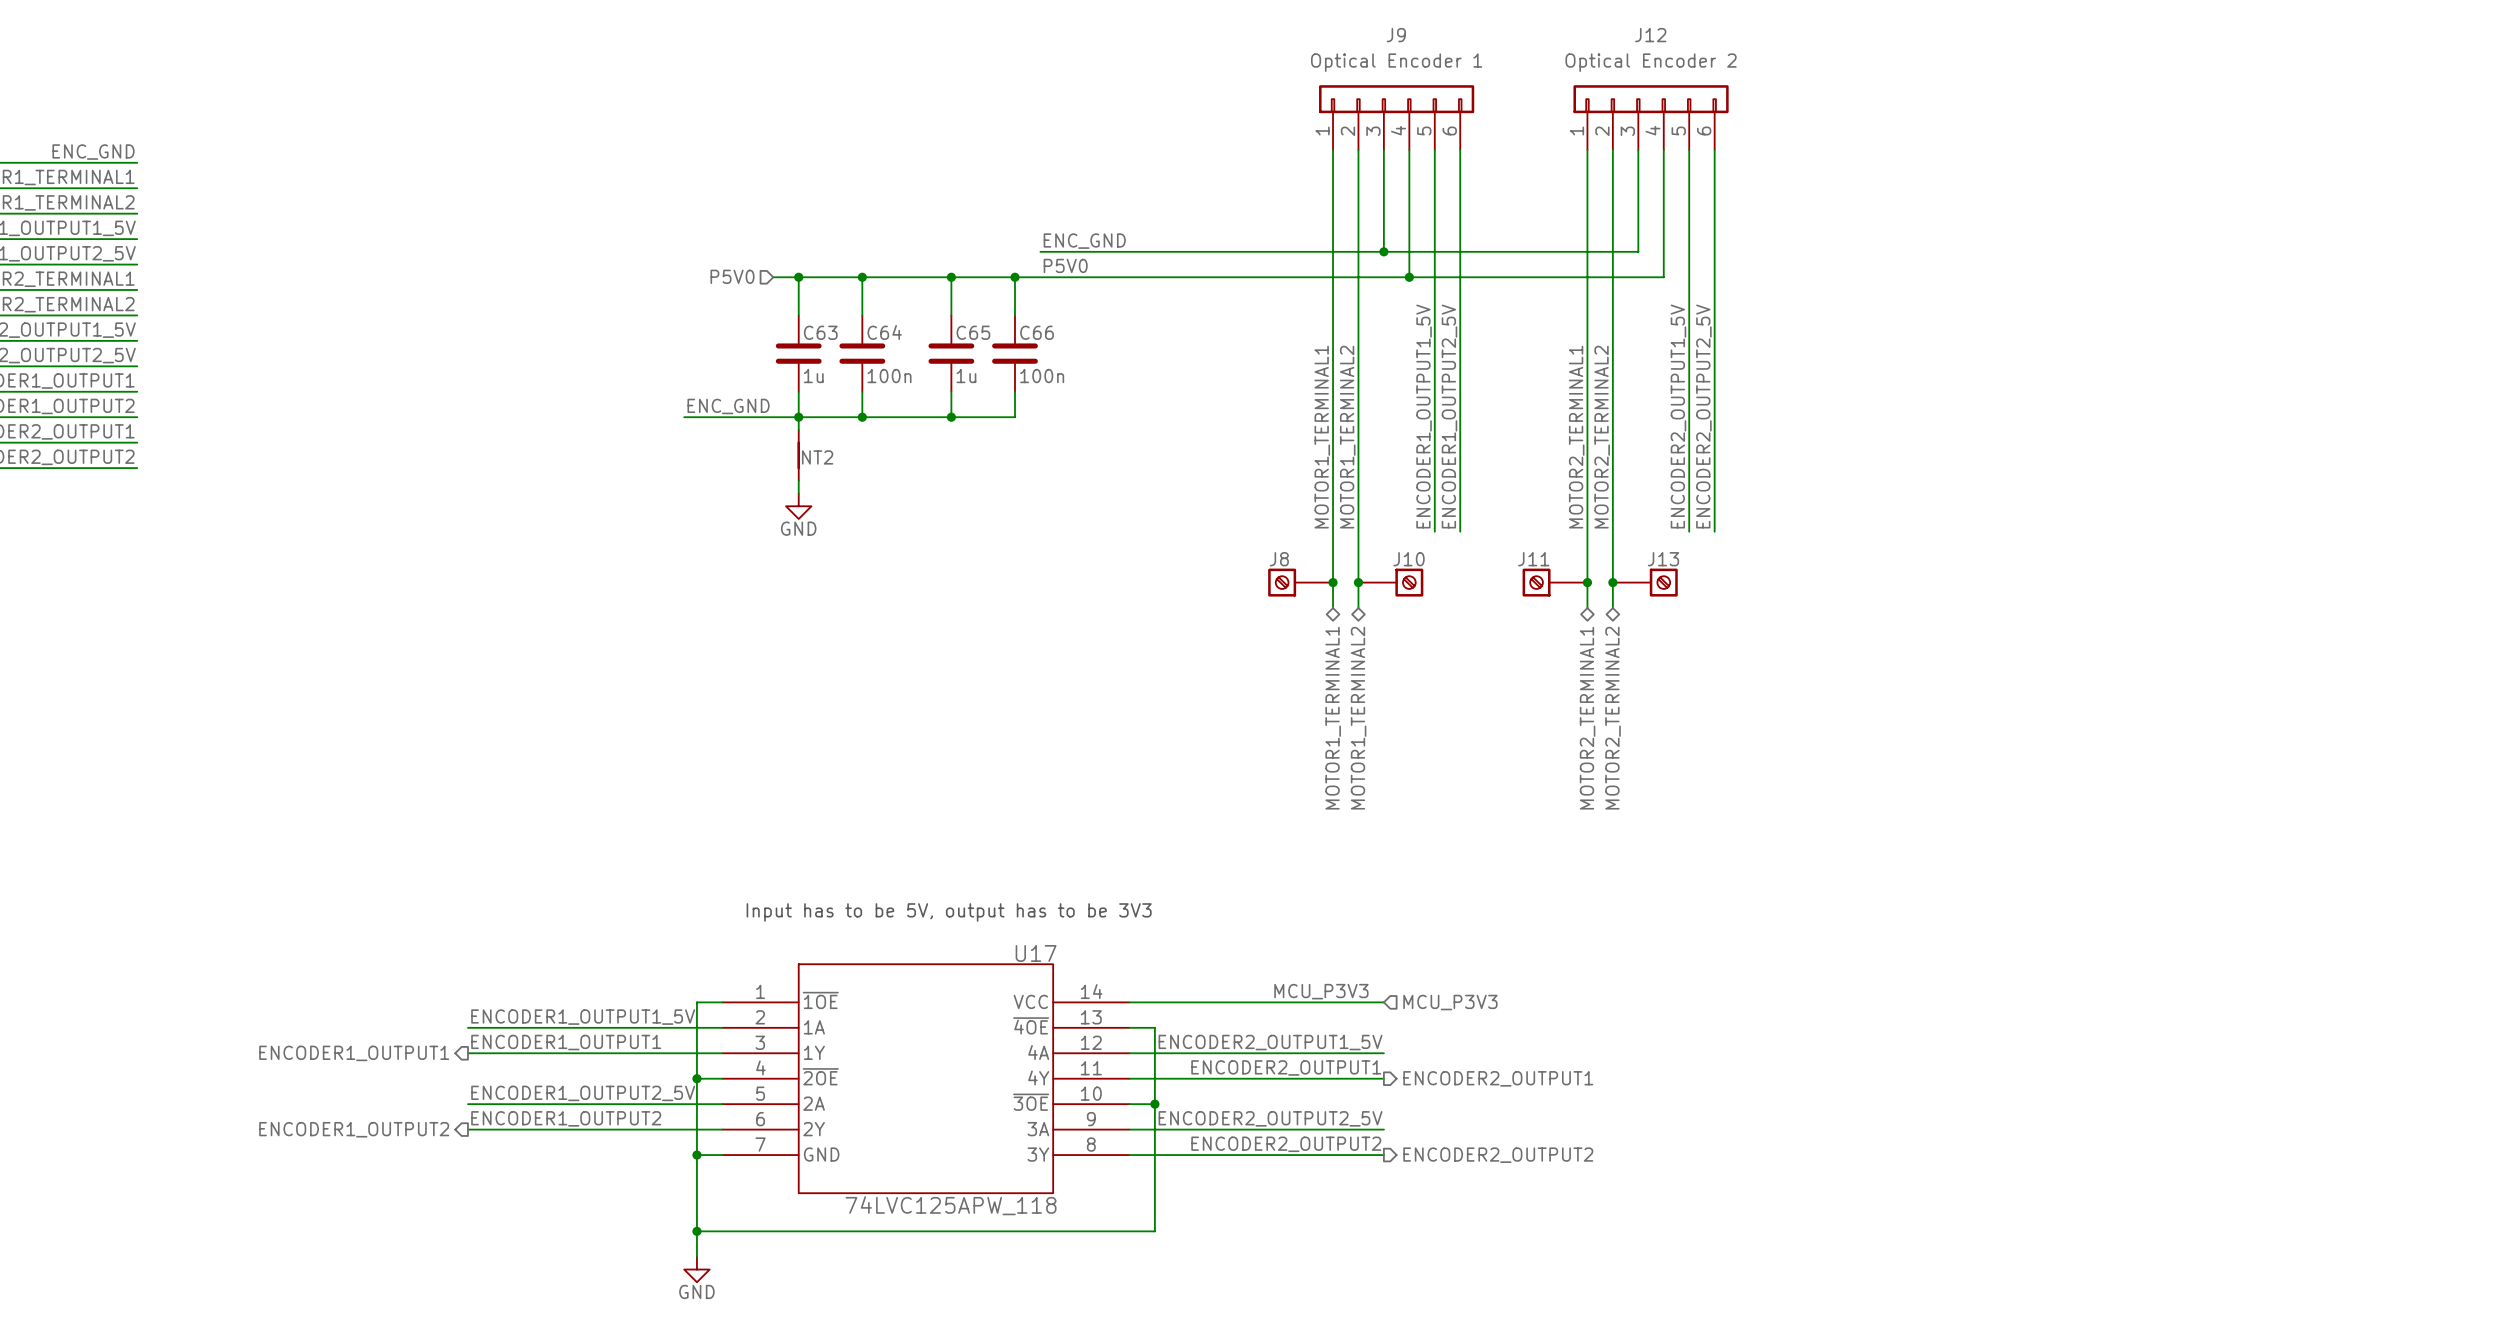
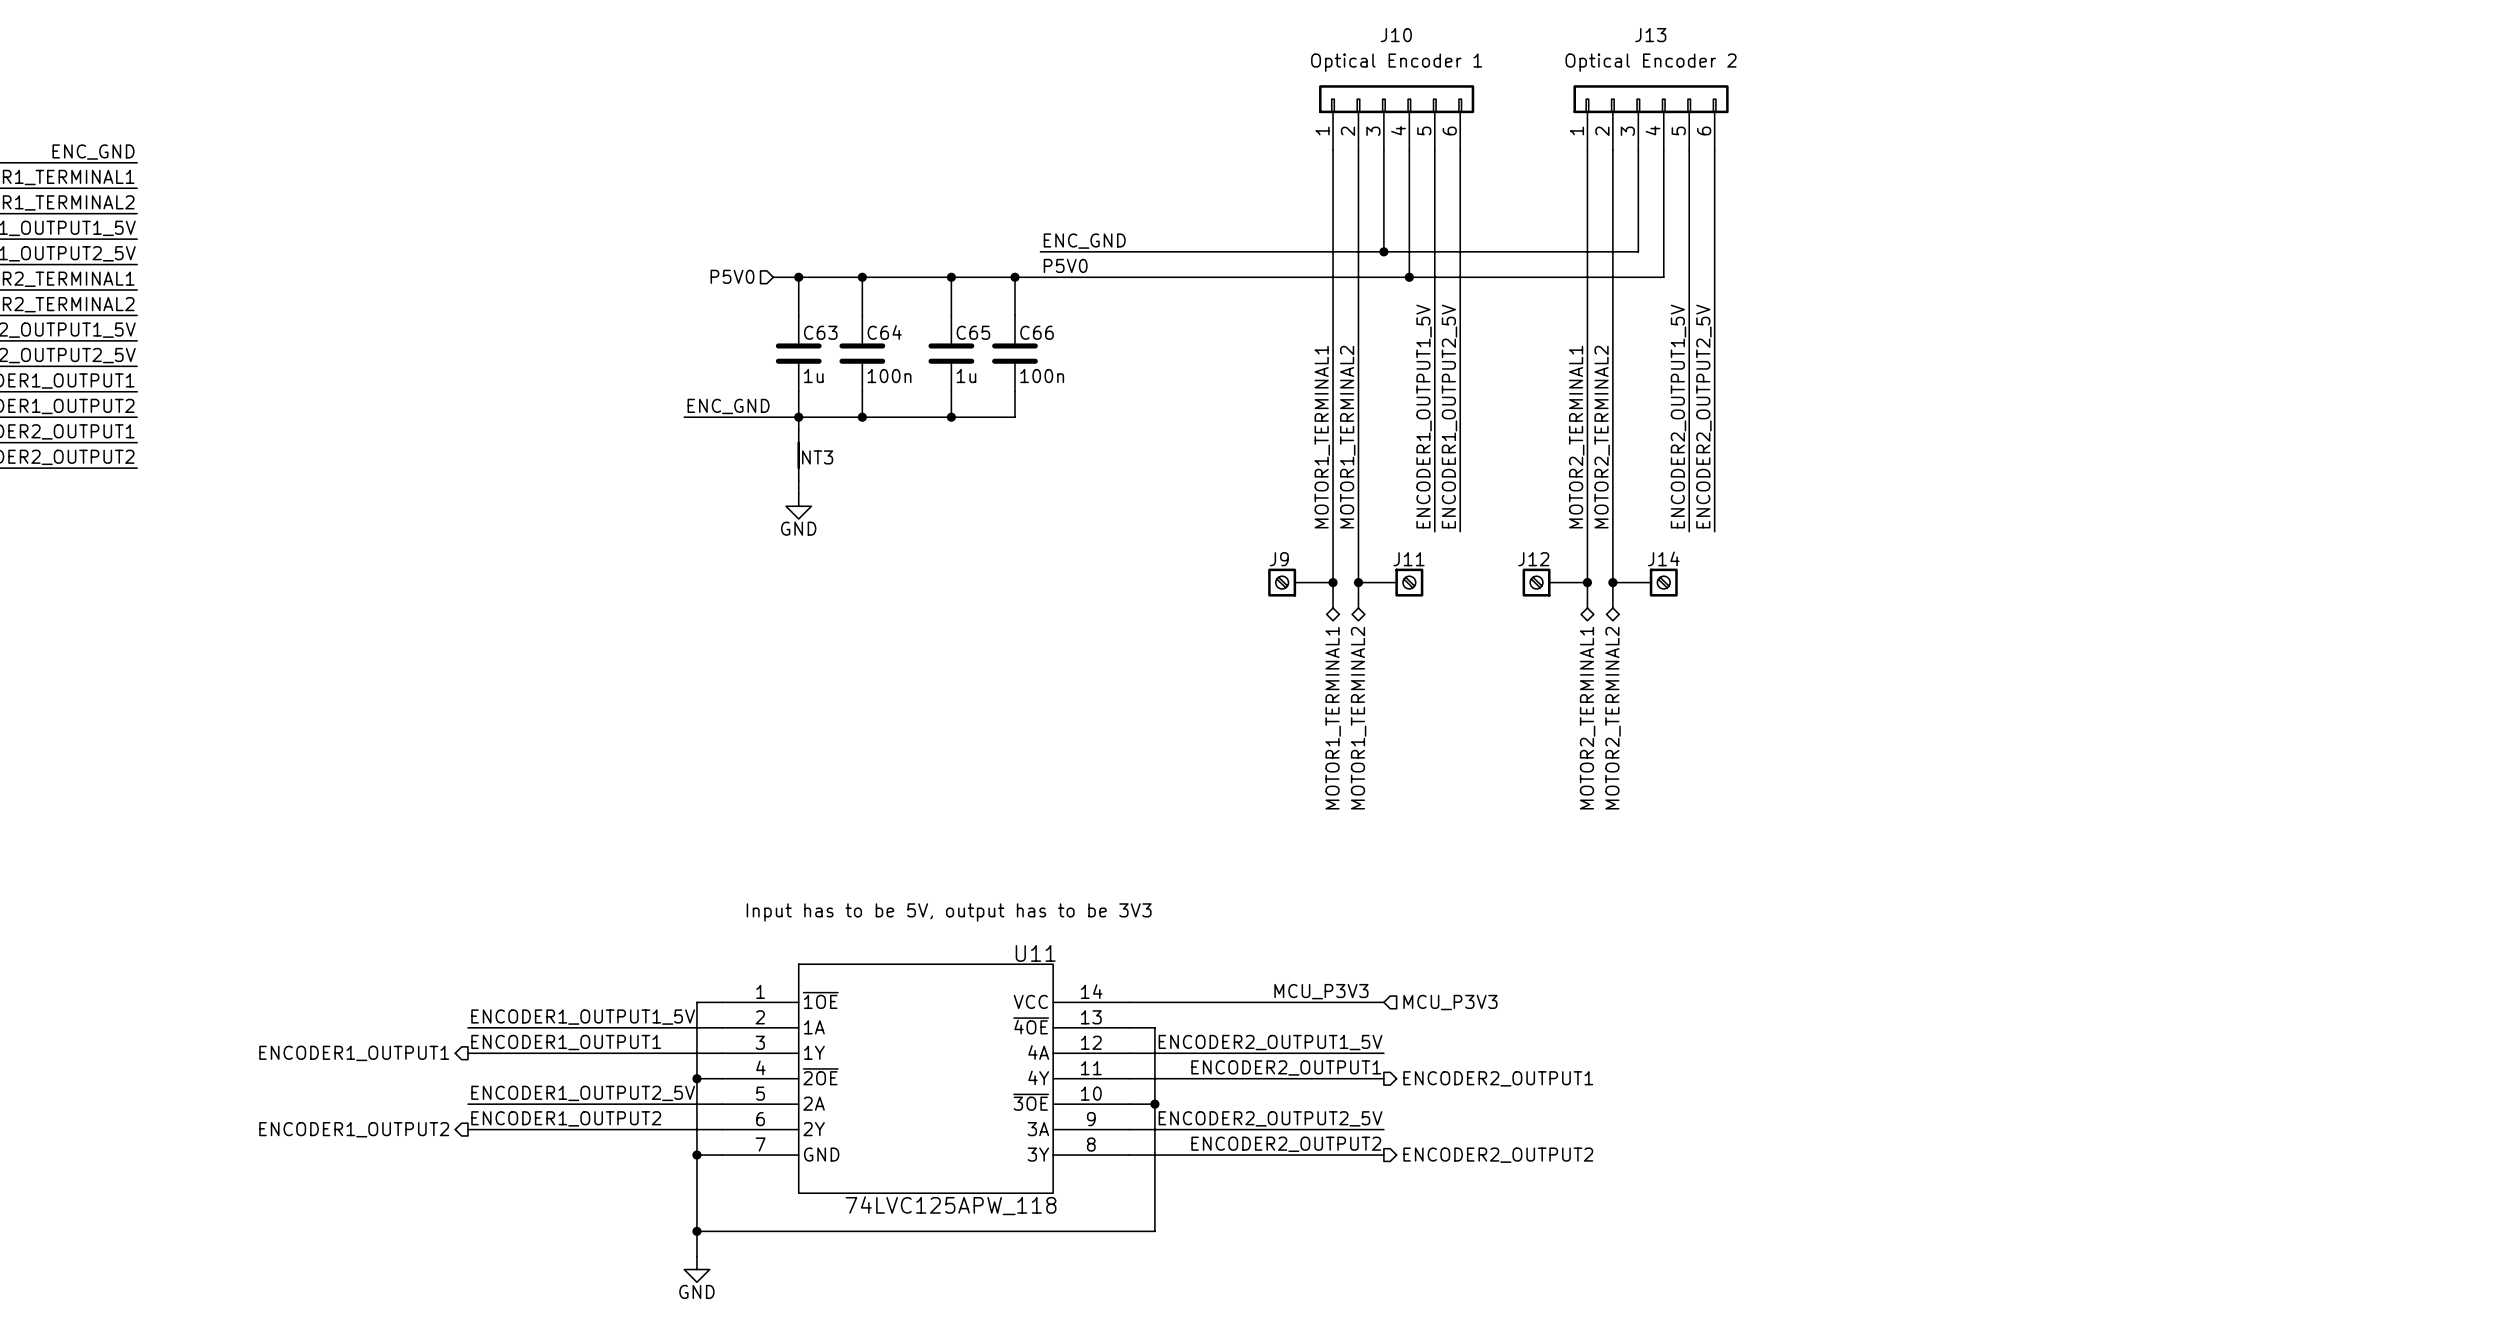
J9 name: J9 (1396, 35) -> J10 (1396, 35)
J12 name: J12 (1650, 35) -> J13 (1650, 35)
NT2 name: NT2 (817, 457) -> NT3 (817, 457)
J8 name: J8 (1279, 559) -> J9 (1279, 559)
J10 name: J10 (1409, 559) -> J11 (1409, 559)
J11 name: J11 (1533, 559) -> J12 (1533, 559)
J13 name: J13 (1663, 559) -> J14 (1663, 558)
U17 name: U17 (1036, 953) -> U11 (1035, 953)

